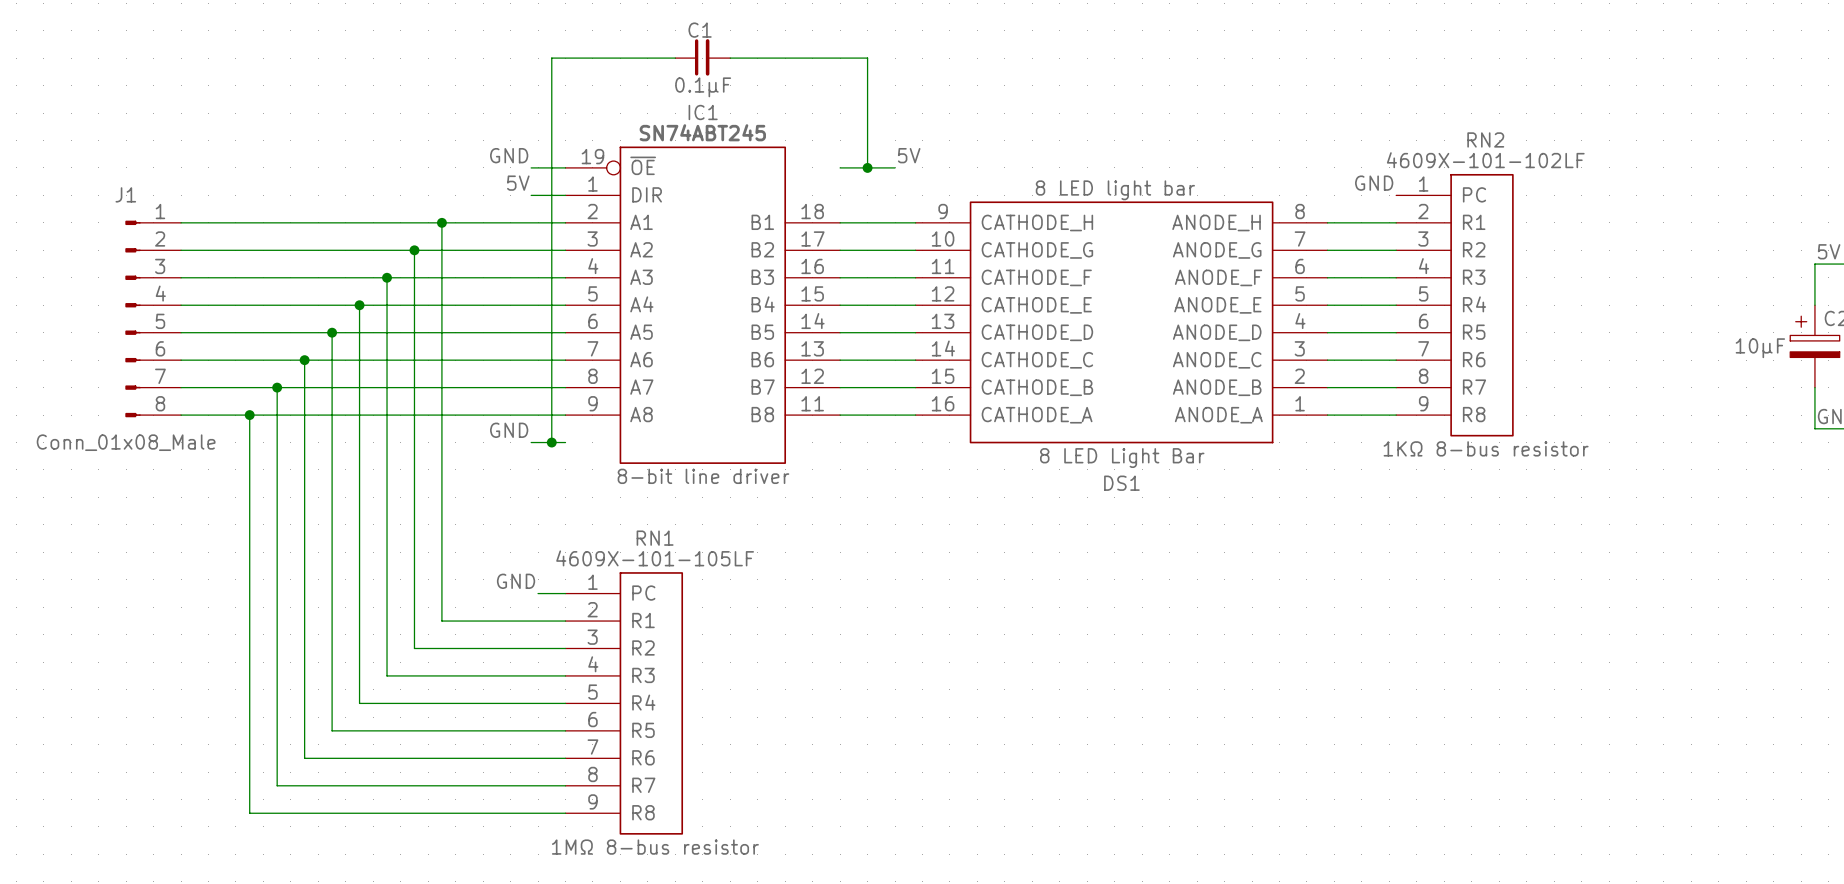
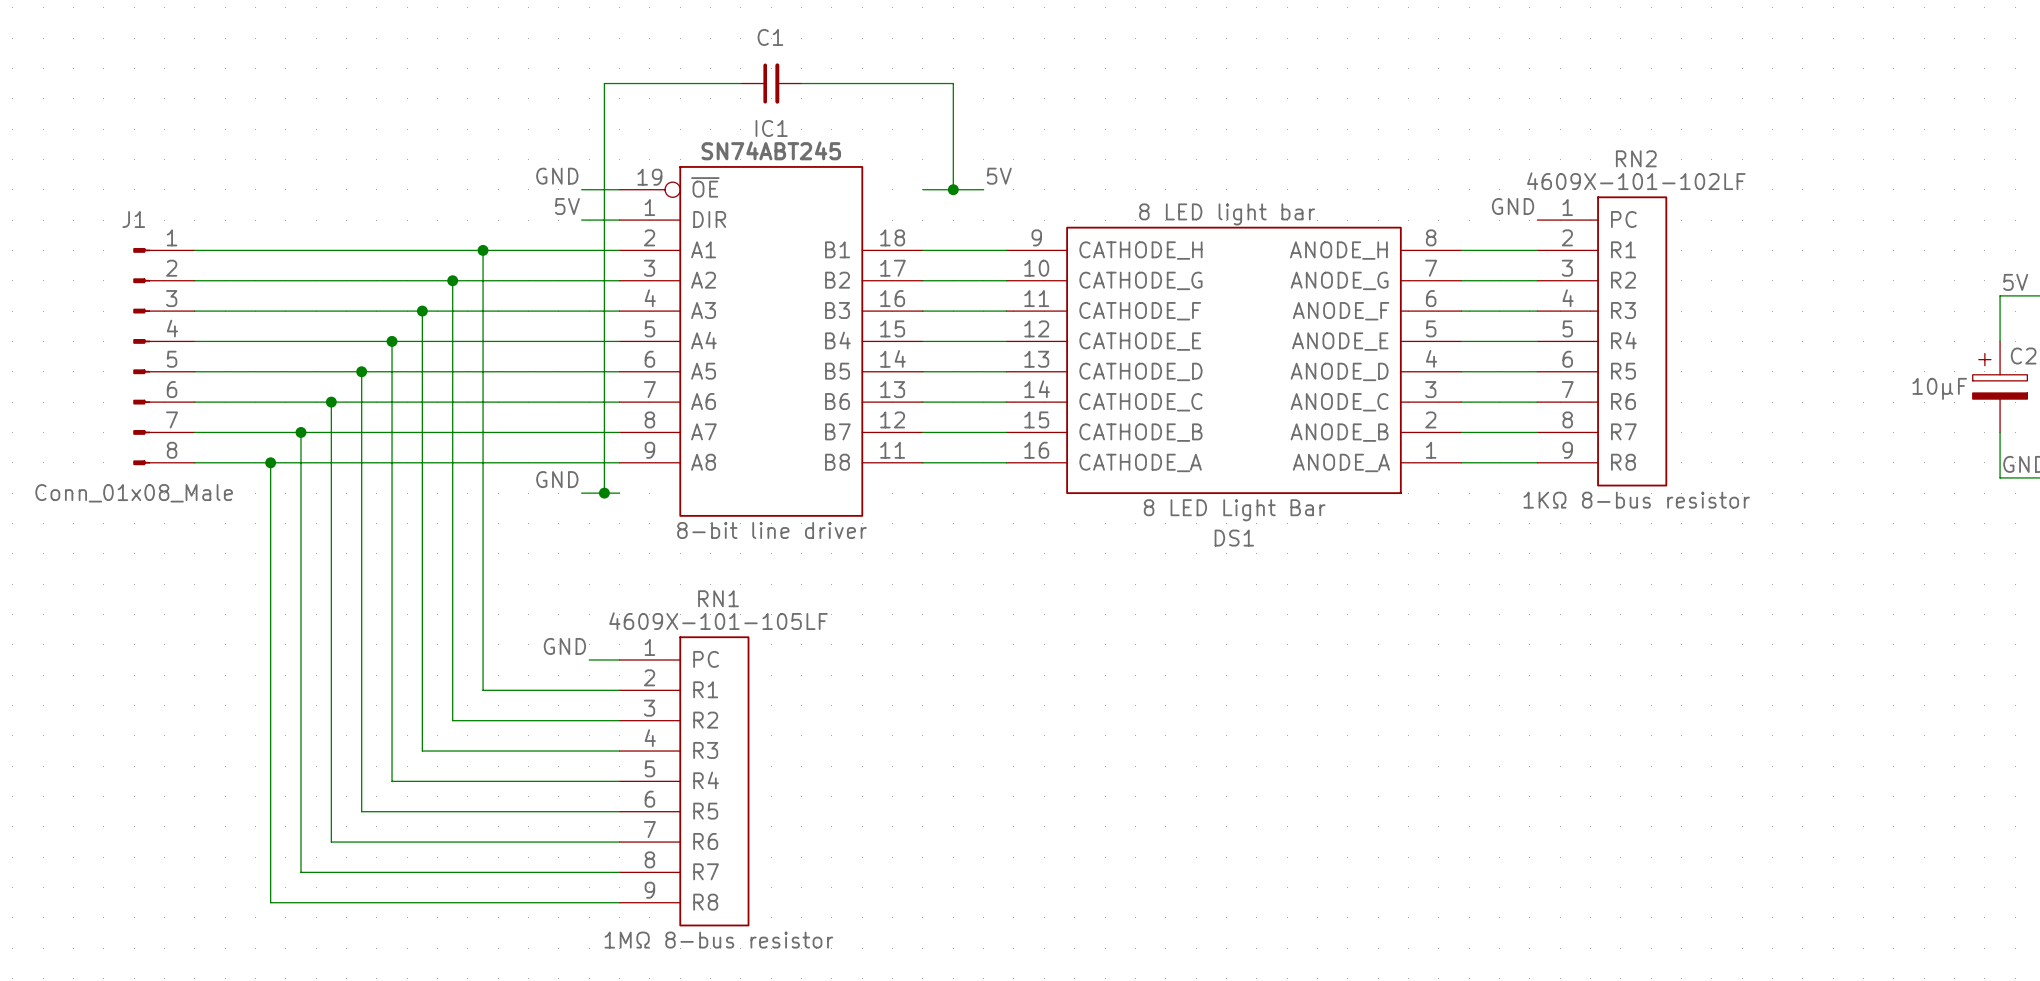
C1 symbol: [675, 39, 731, 76] -> [740, 63, 802, 104]
wire: (675, 58) (551, 58) (551, 71) -> (740, 83) (604, 83)
wire: (730, 58) (867, 58) (867, 71) -> (801, 83) (953, 83)
C1 text: 0.1μF (703, 87) -> none

